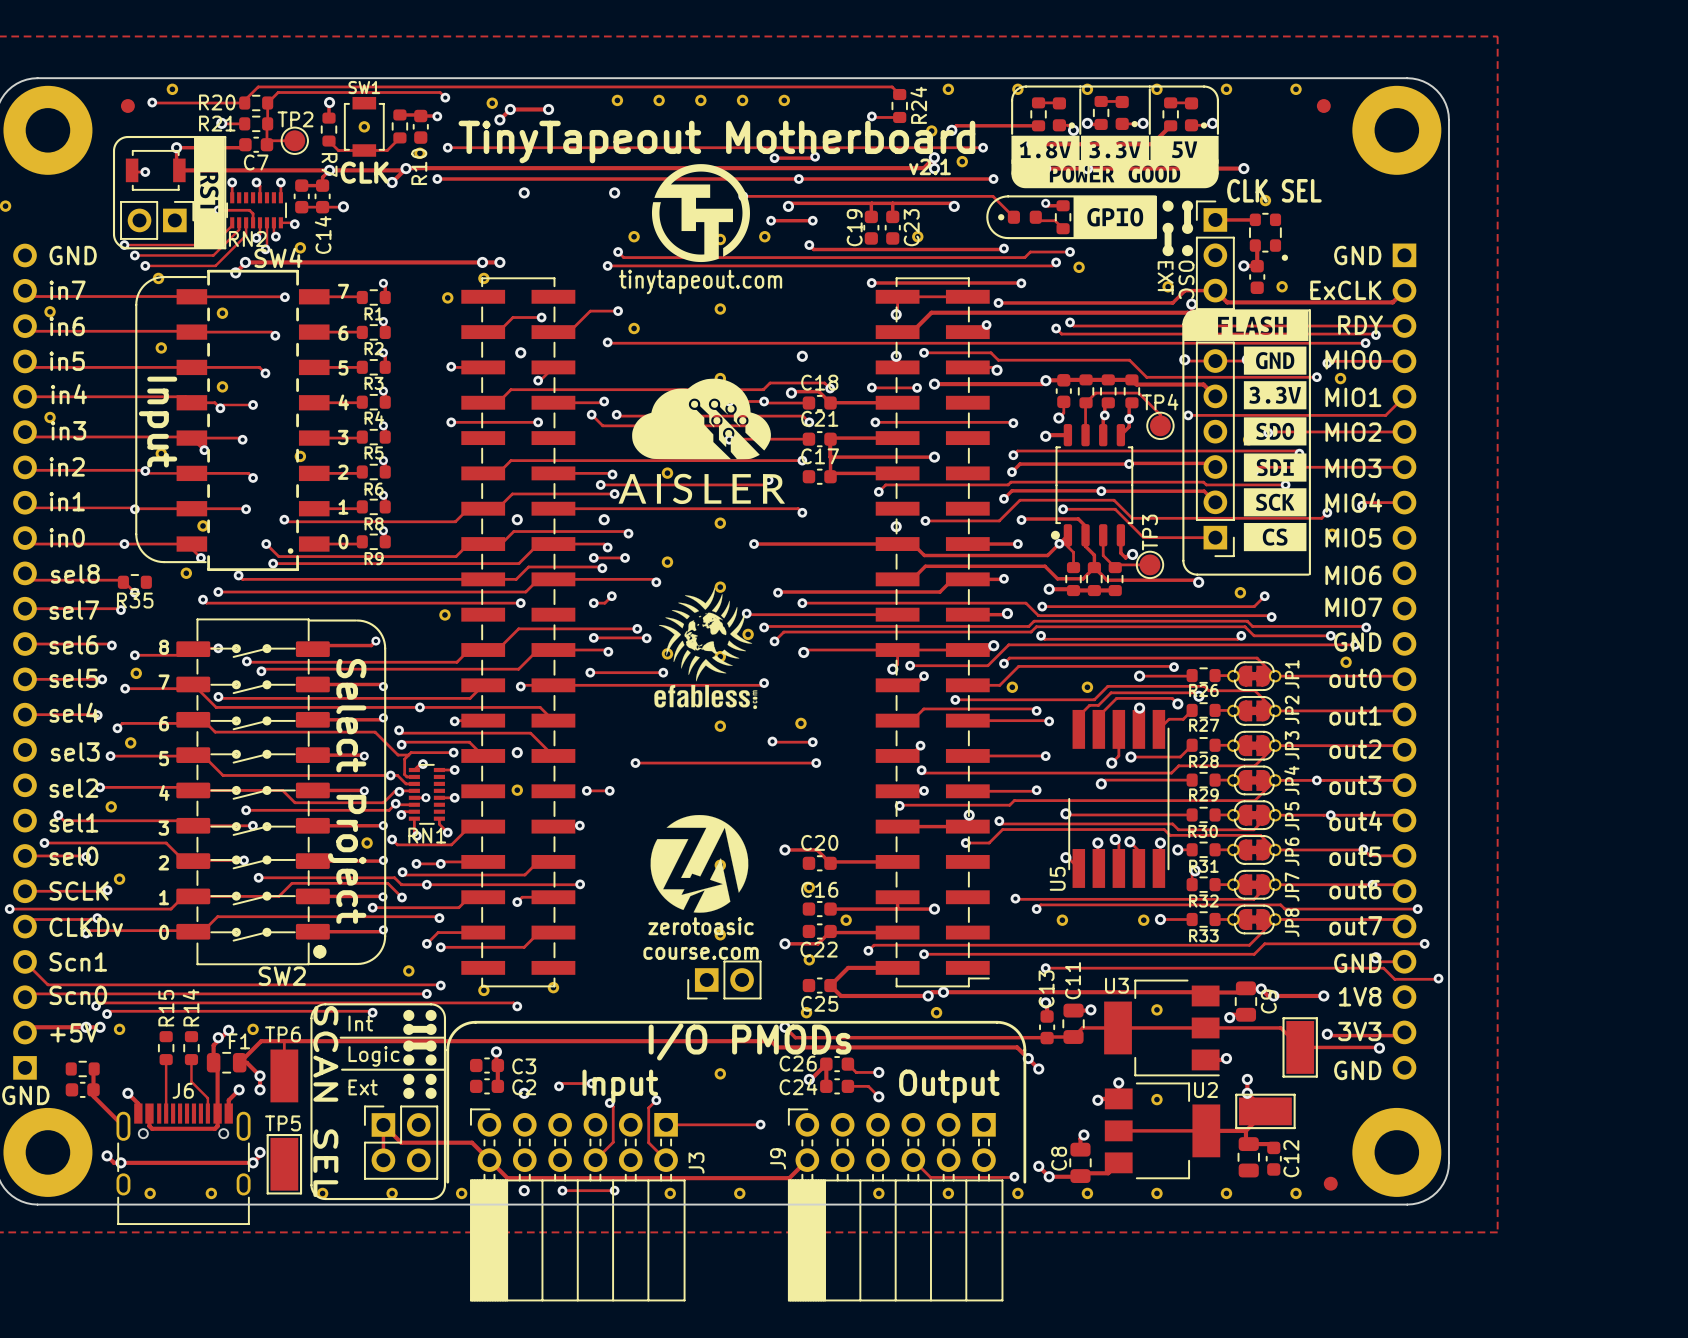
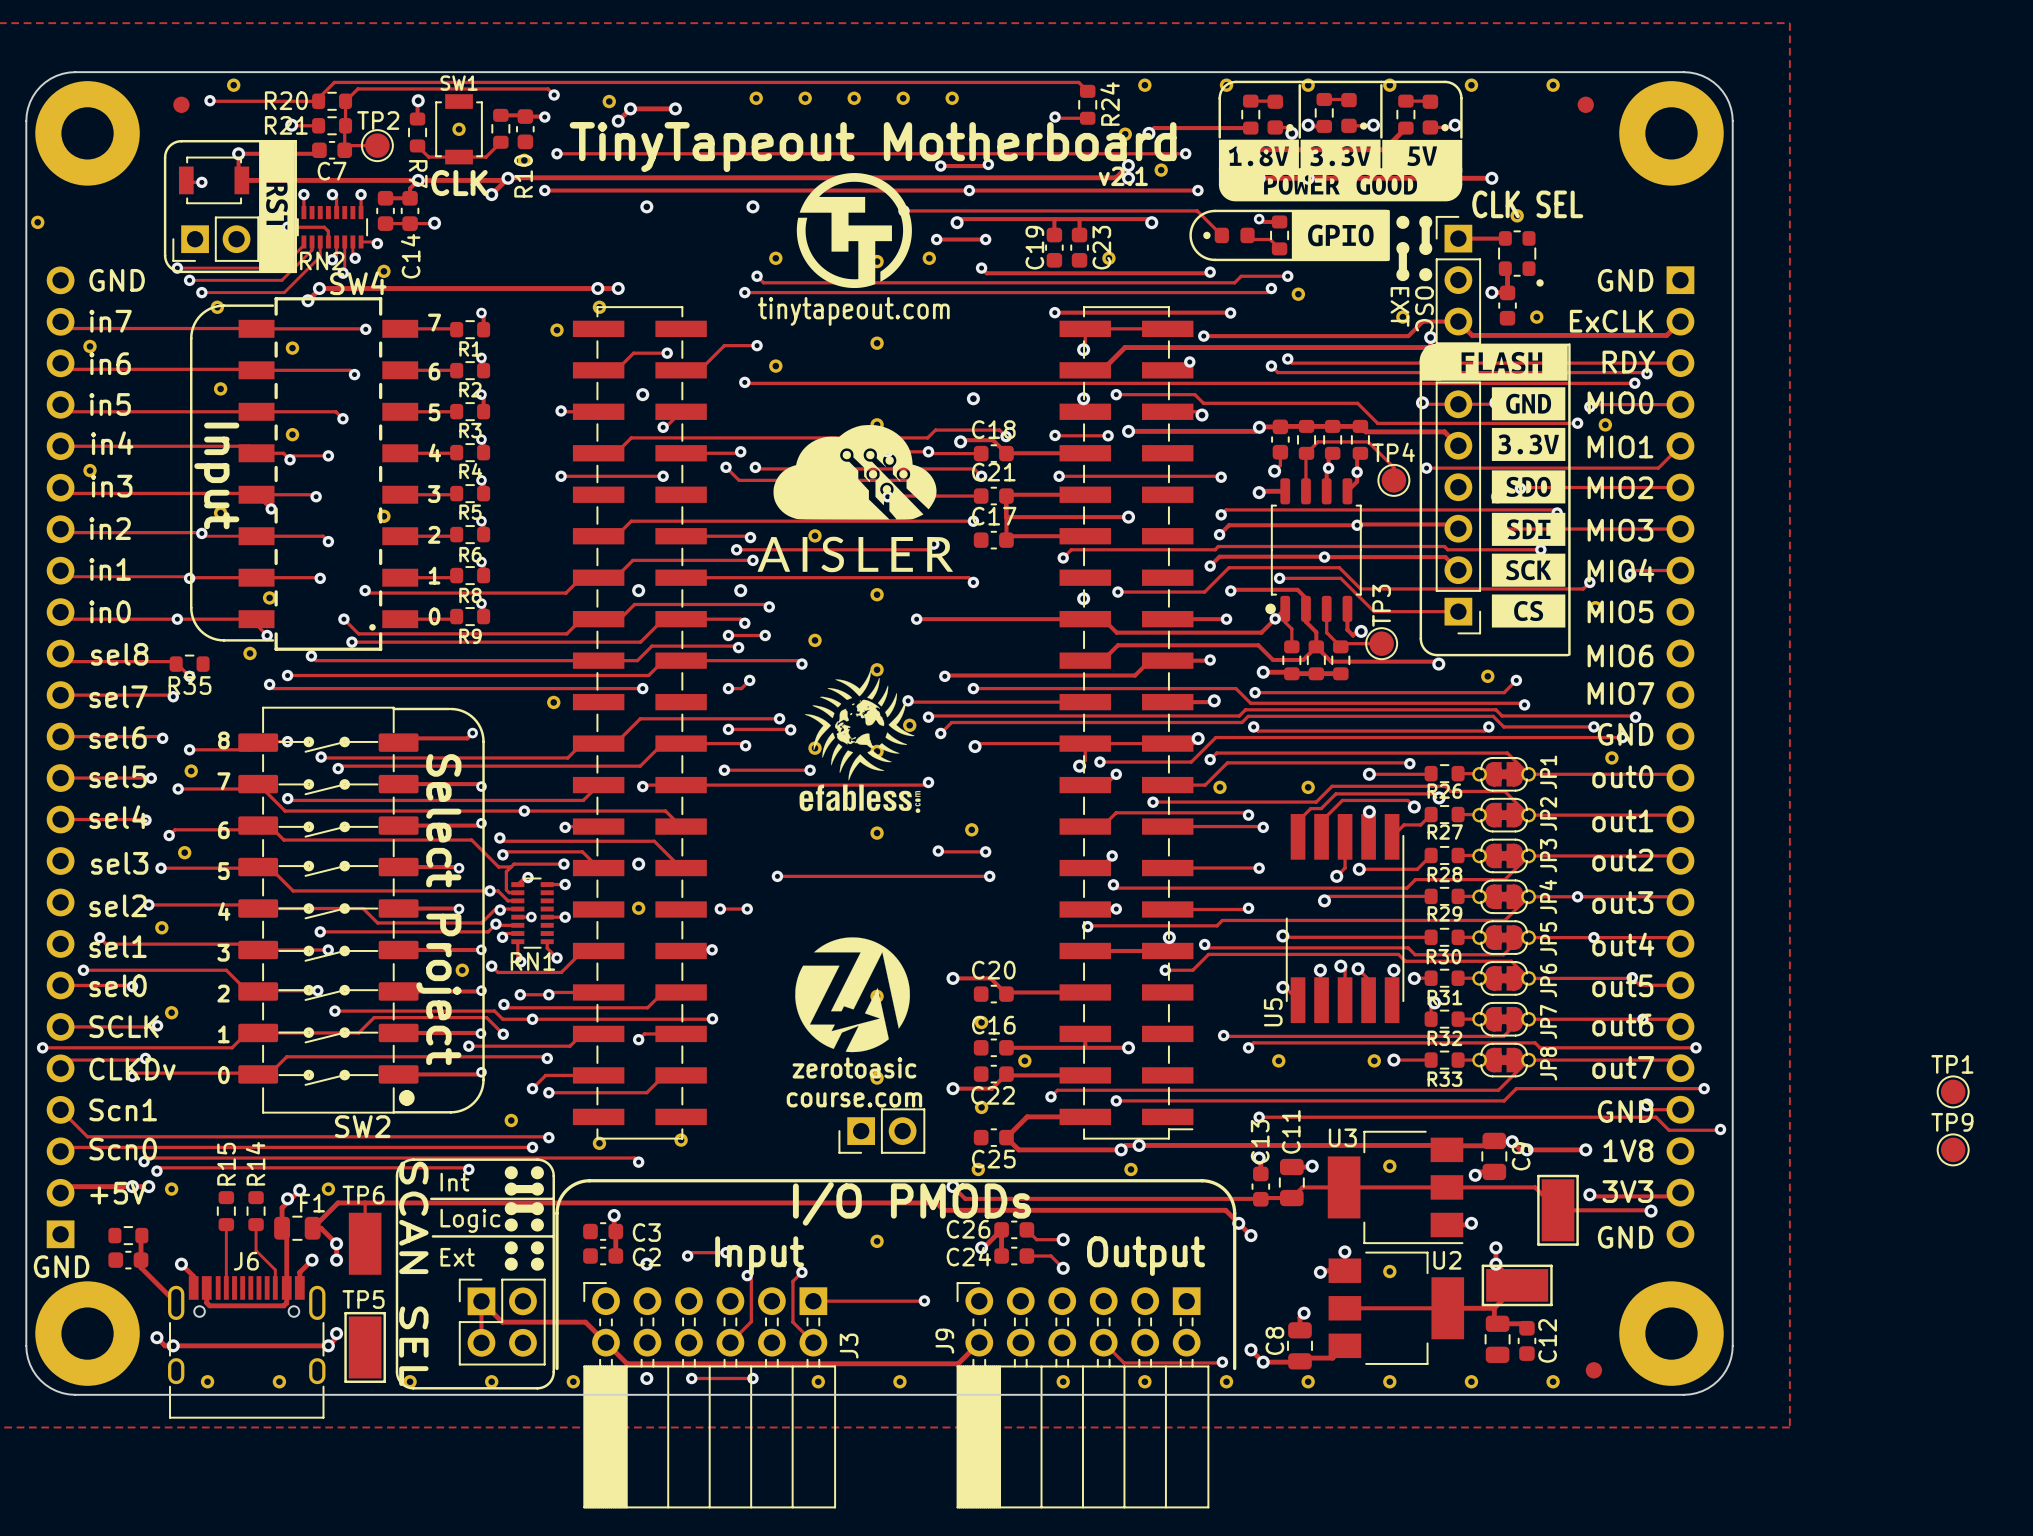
part rotation: 0° (157, 220) -> 180° (215, 239)
TP1: none -> (1953, 1091)
TP9: none -> (1953, 1149)

